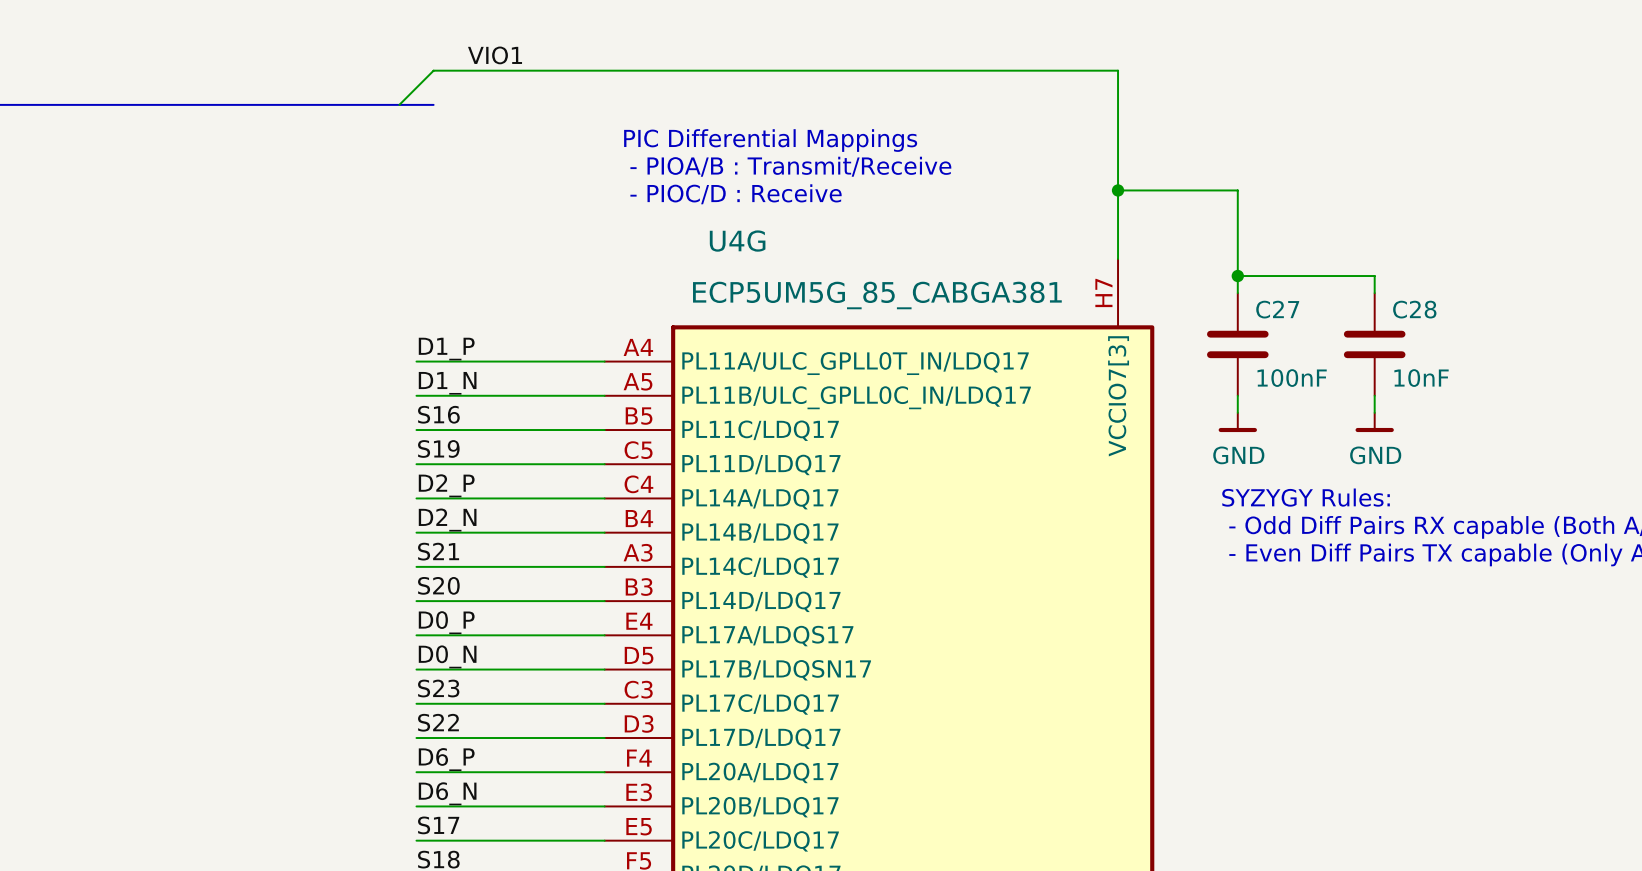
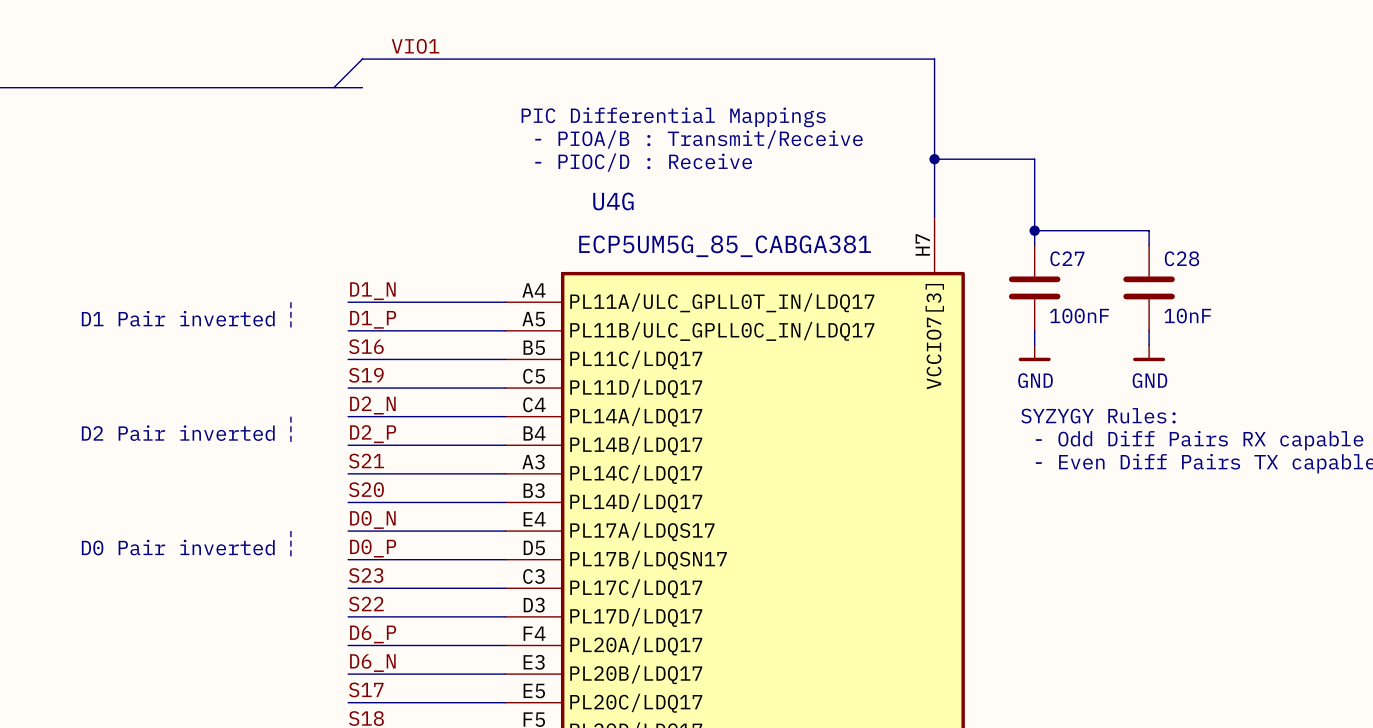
label: D1_P (446, 349) -> D1_N (372, 291)
line: none -> (290, 302) (290, 330)
text: none -> D1 Pair inverted (178, 318)
label: D1_N (447, 383) -> D1_P (373, 319)
label: D2_P (446, 485) -> D2_N (372, 405)
line: none -> (290, 416) (290, 445)
text: none -> D2 Pair inverted (178, 433)
label: D2_N (447, 520) -> D2_P (373, 434)
label: D0_P (446, 622) -> D0_N (372, 519)
line: none -> (290, 531) (290, 559)
text: none -> D0 Pair inverted (178, 547)
label: D0_N (447, 656) -> D0_P (373, 548)

